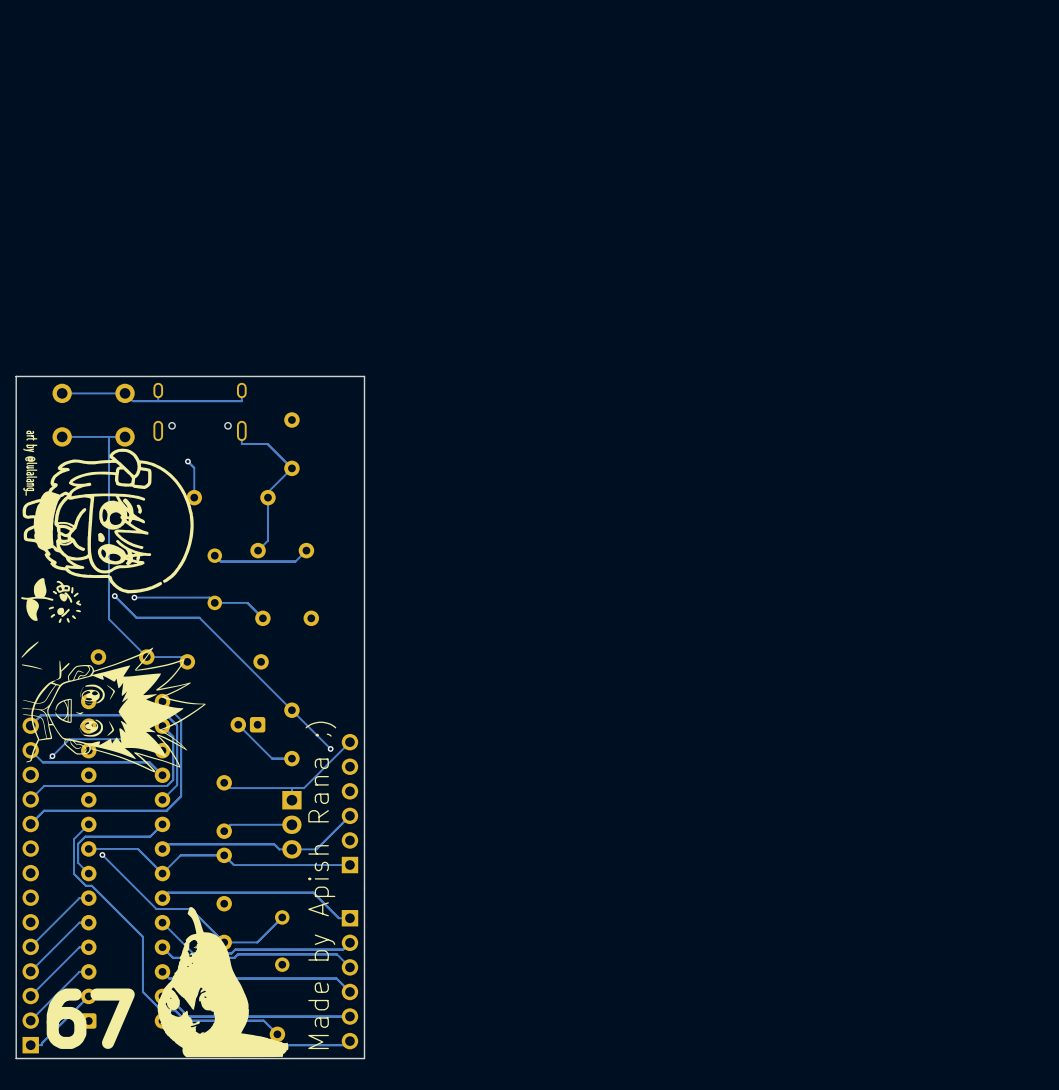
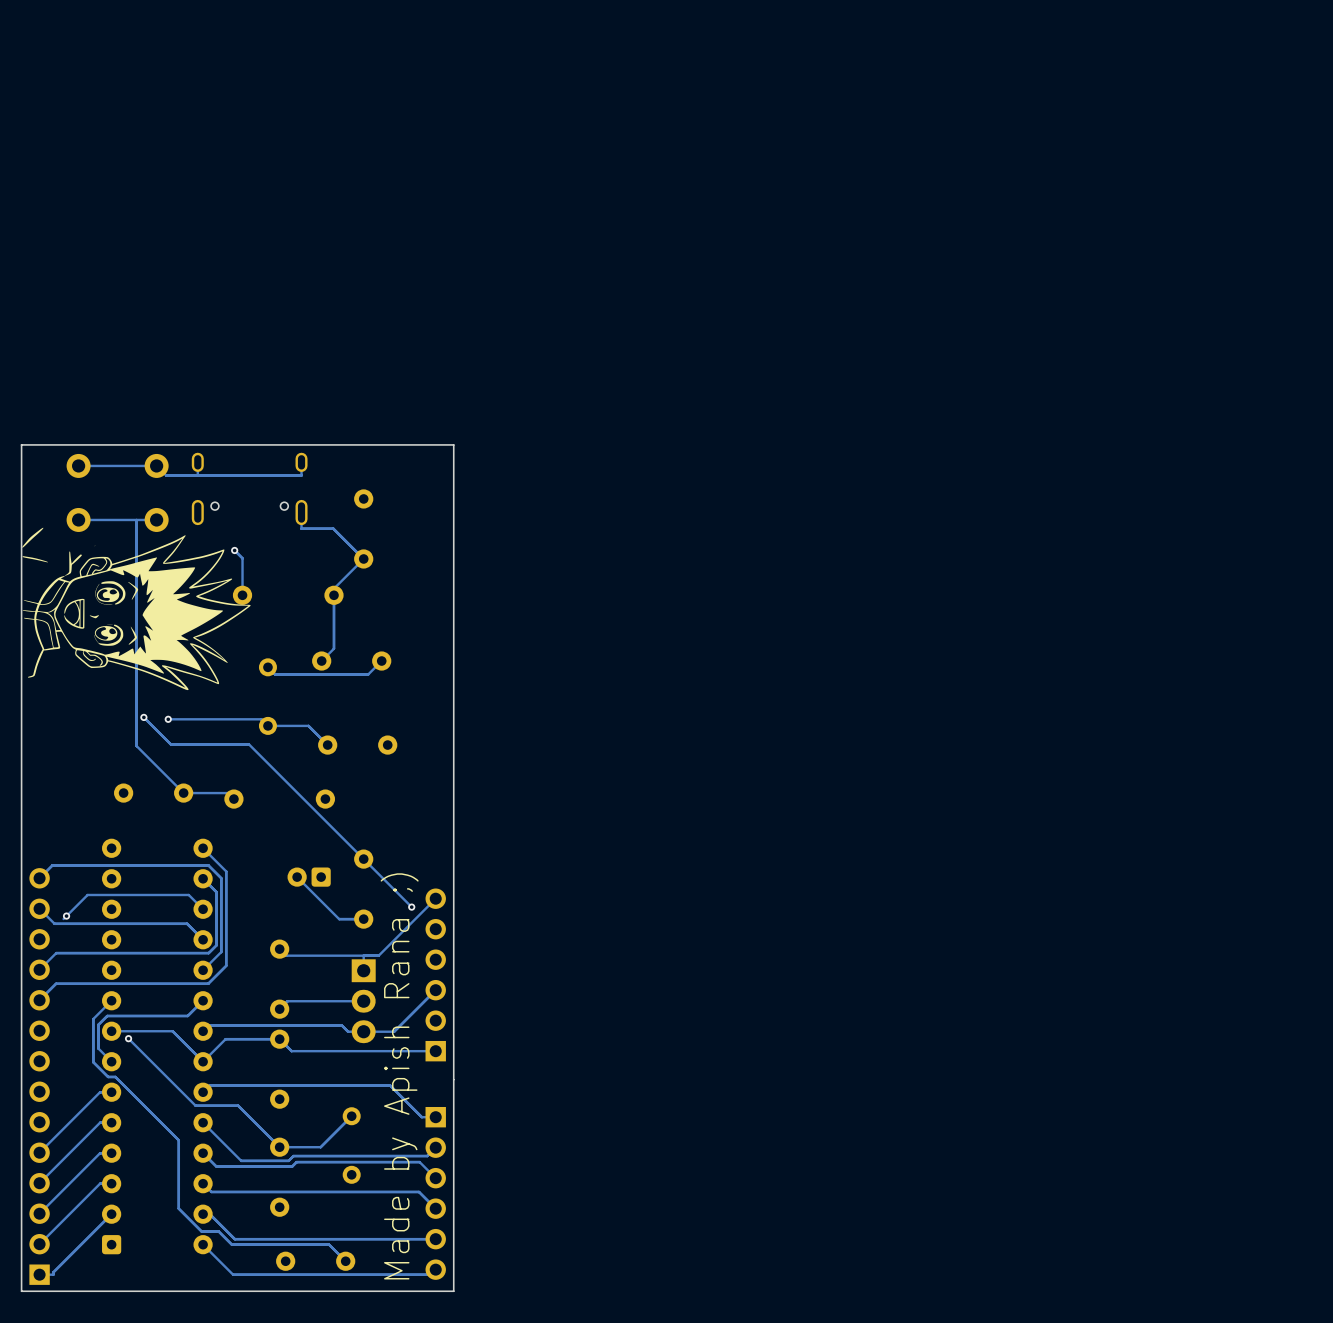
drawing: [21, 448, 194, 623] -> none
text: art by @lulalang_ (30, 463) -> none
drawing position: (113, 706) -> (136, 608)
drawing: [157, 907, 293, 1058] -> none
text: 67 (90, 1018) -> none

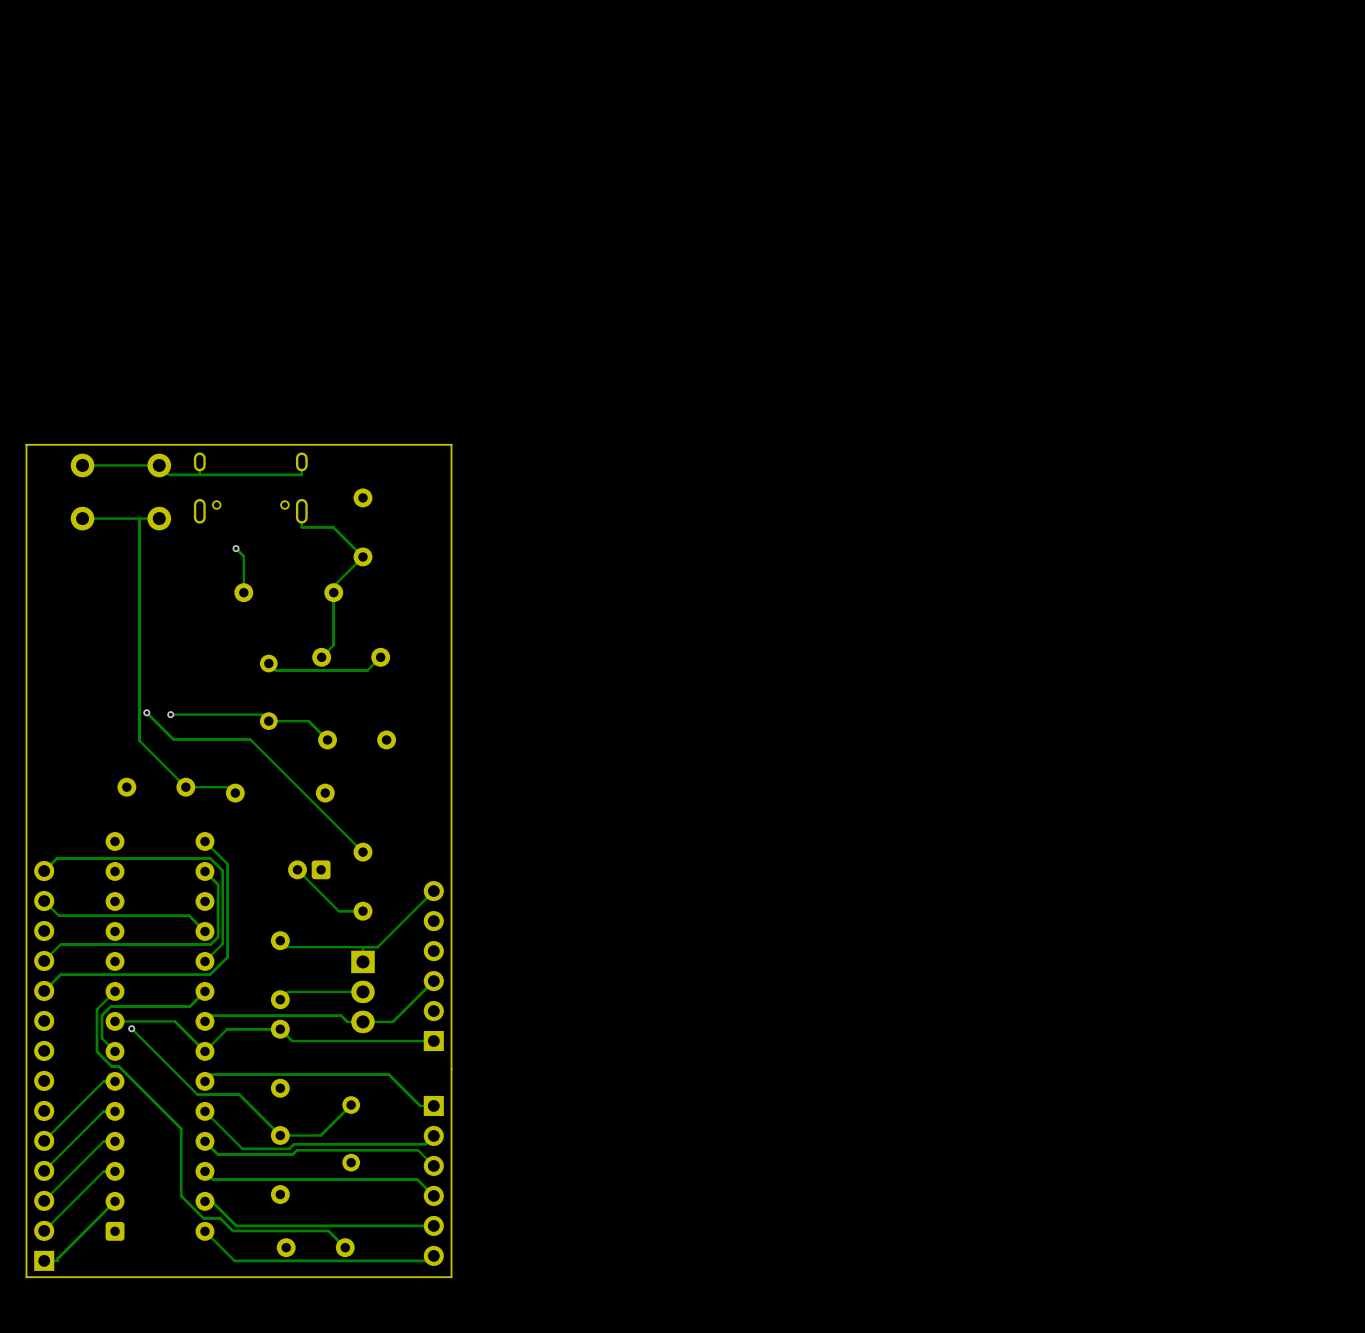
drawing: [22, 527, 251, 691] -> none
track: (363, 859) (411, 907) -> none
via: (411, 907) -> none
track: (203, 909) (188, 894) (87, 894) (63, 919) -> none
via: (66, 916) -> none
text: Made by Apish Rana ;) (399, 1076) -> none

